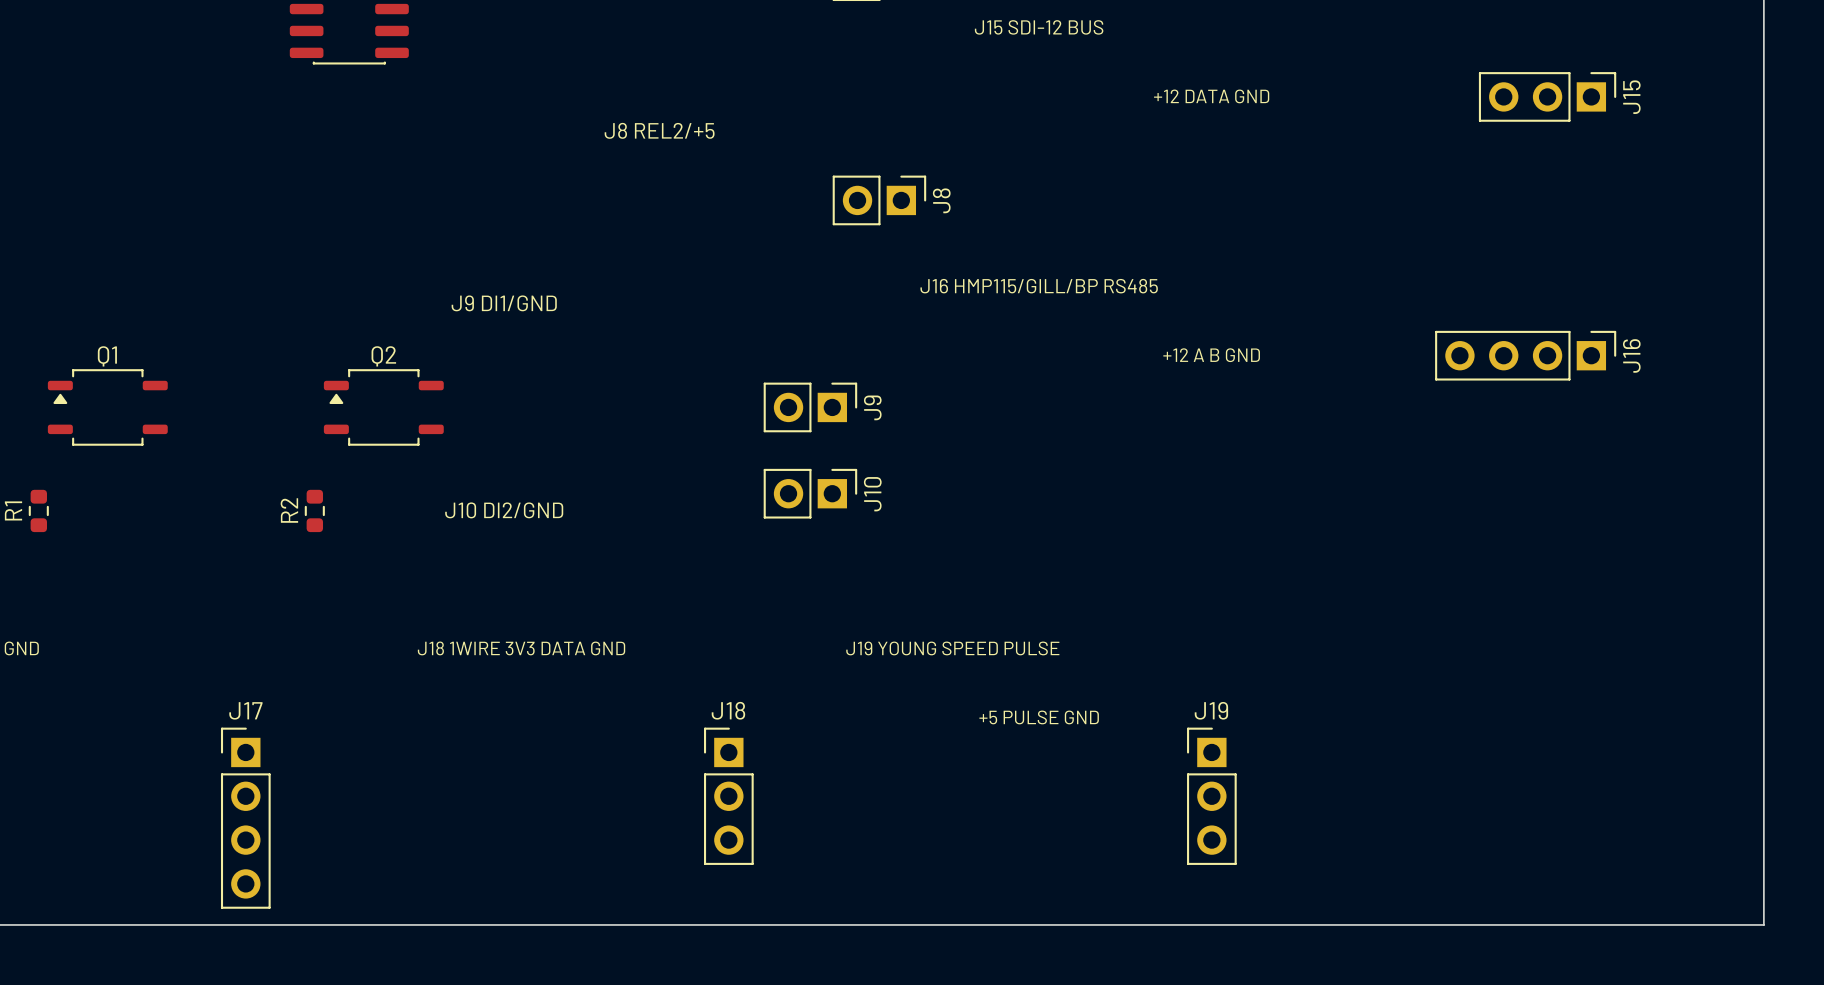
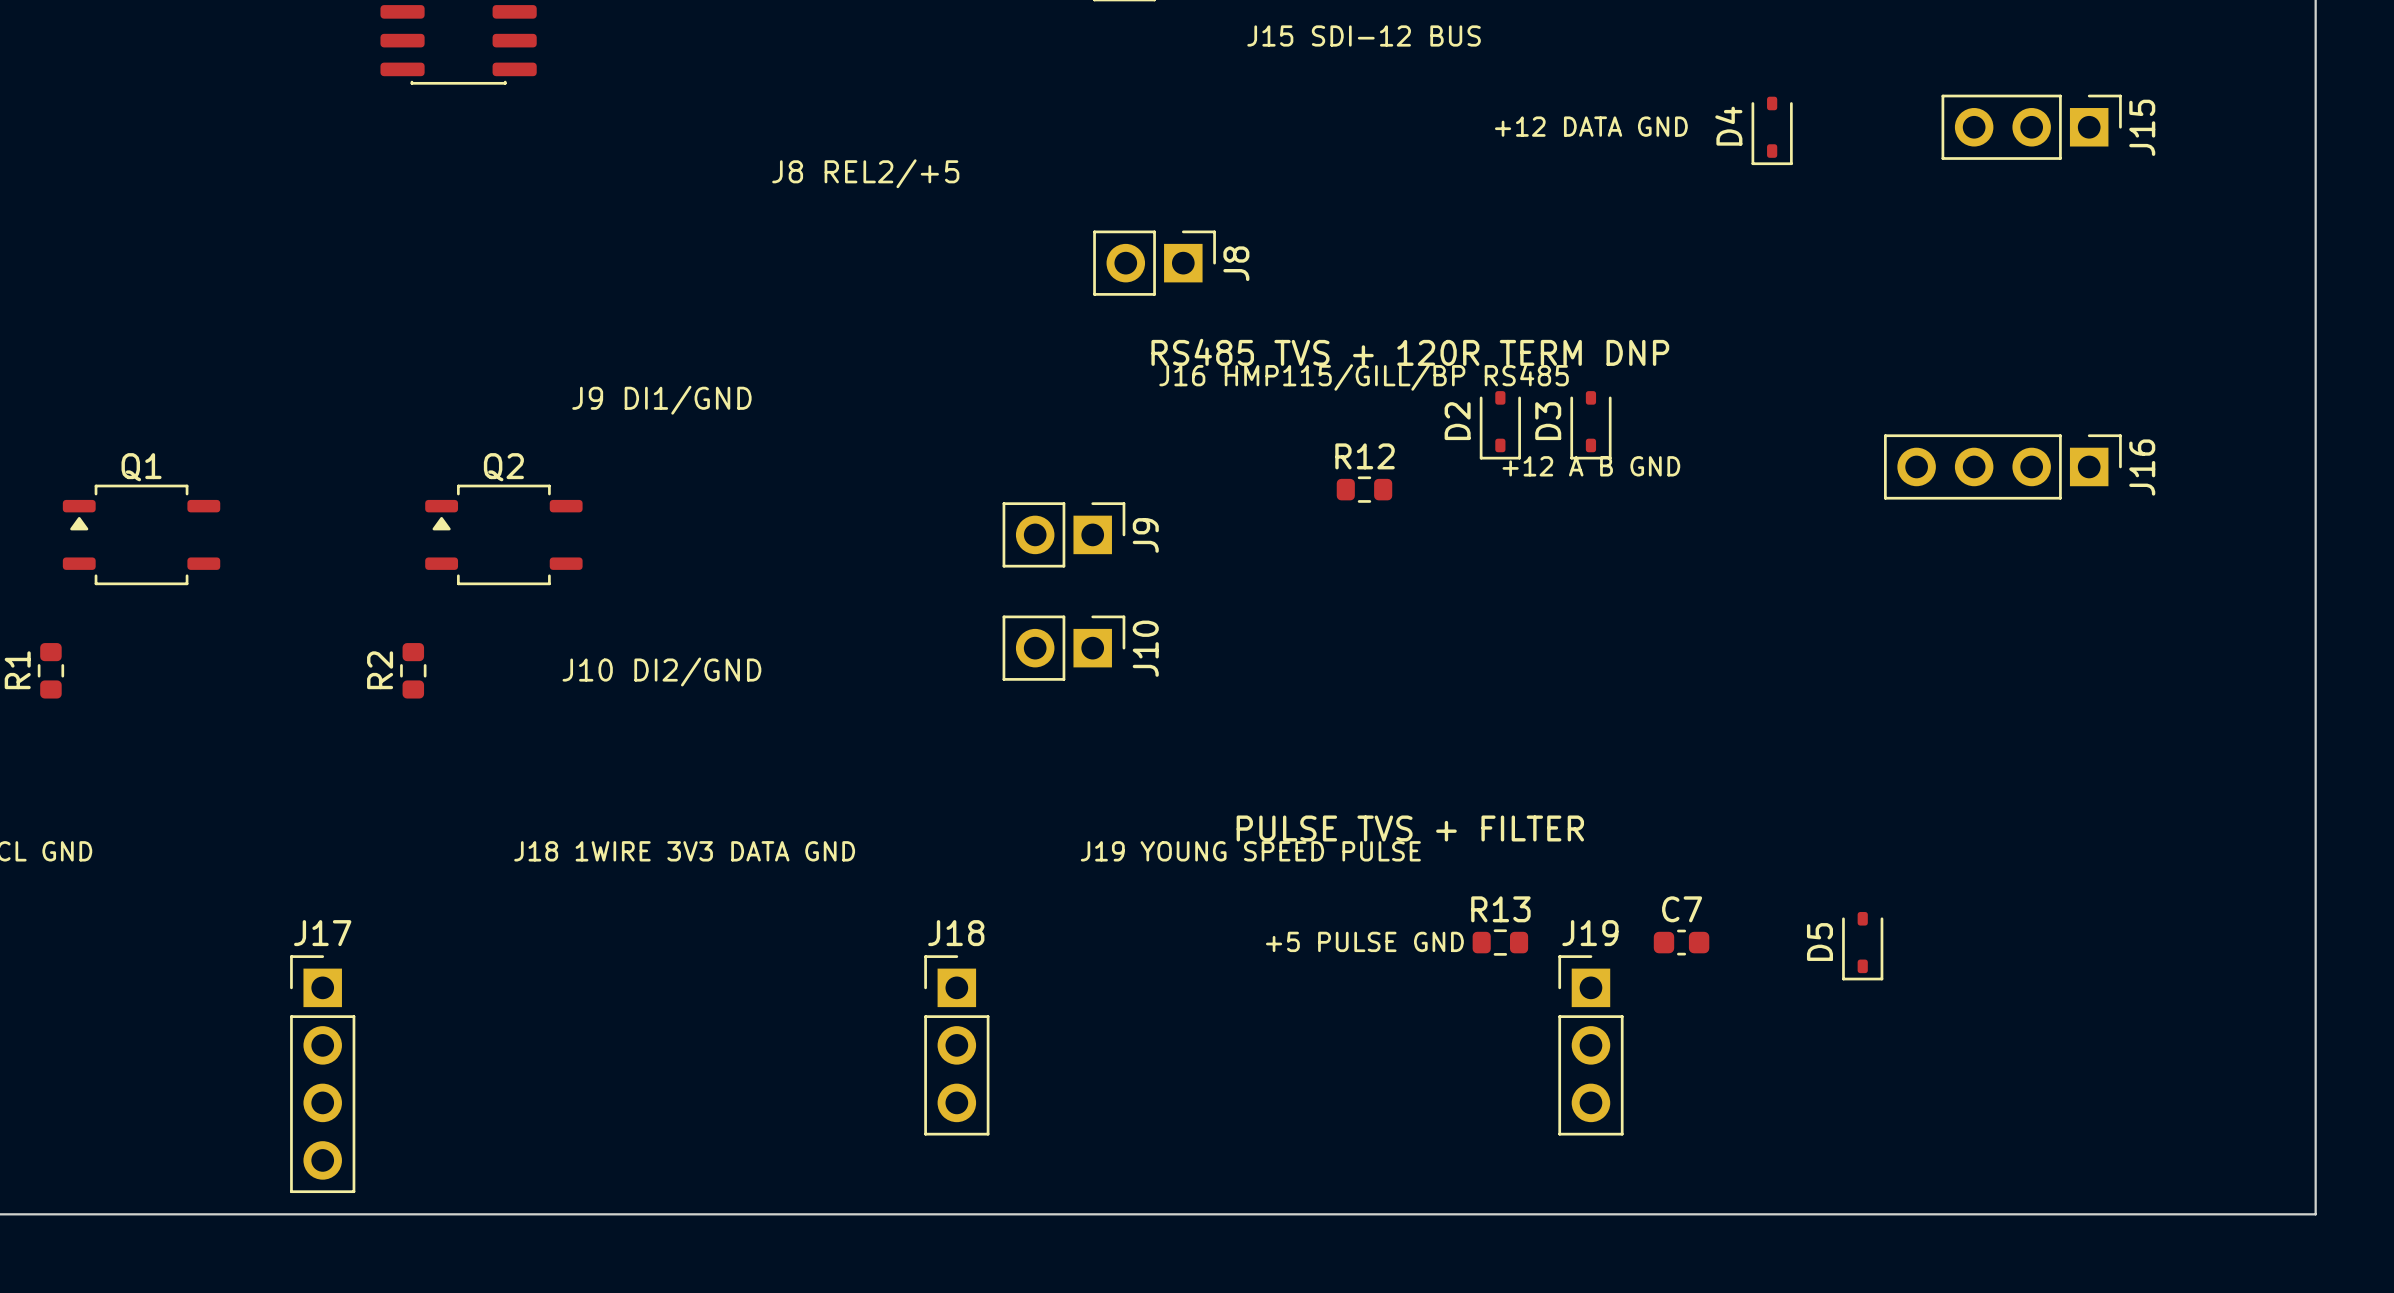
D4: none -> (1772, 130)
text: none -> RS485 TVS + 120R TERM DNP (1410, 352)
D2: none -> (1500, 425)
D3: none -> (1590, 425)
R12: none -> (1364, 489)
text: none -> PULSE TVS + FILTER (1410, 828)
R13: none -> (1500, 942)
C7: none -> (1681, 942)
D5: none -> (1862, 946)

